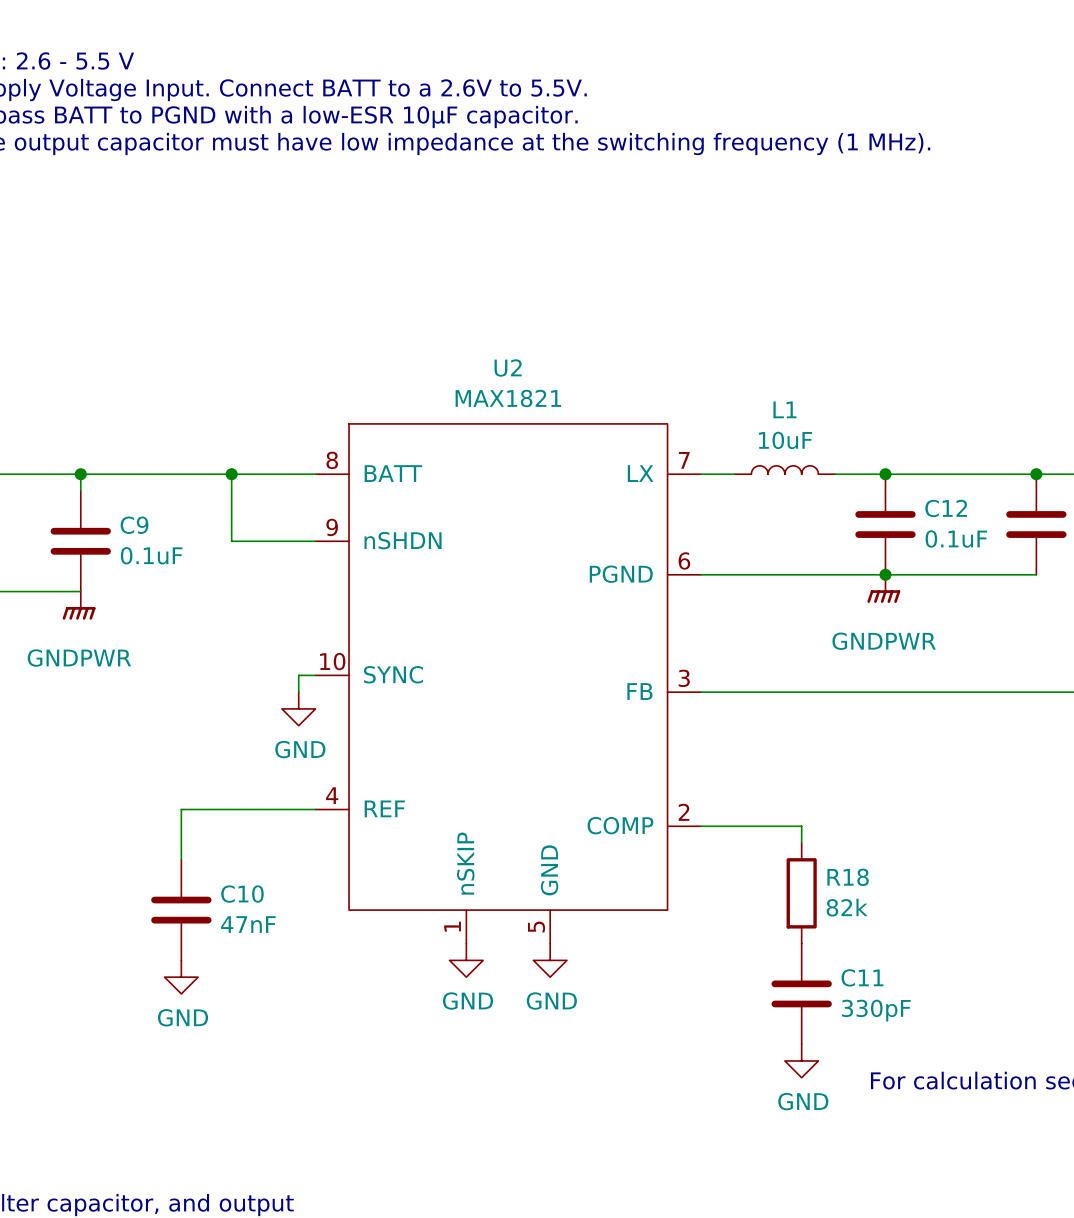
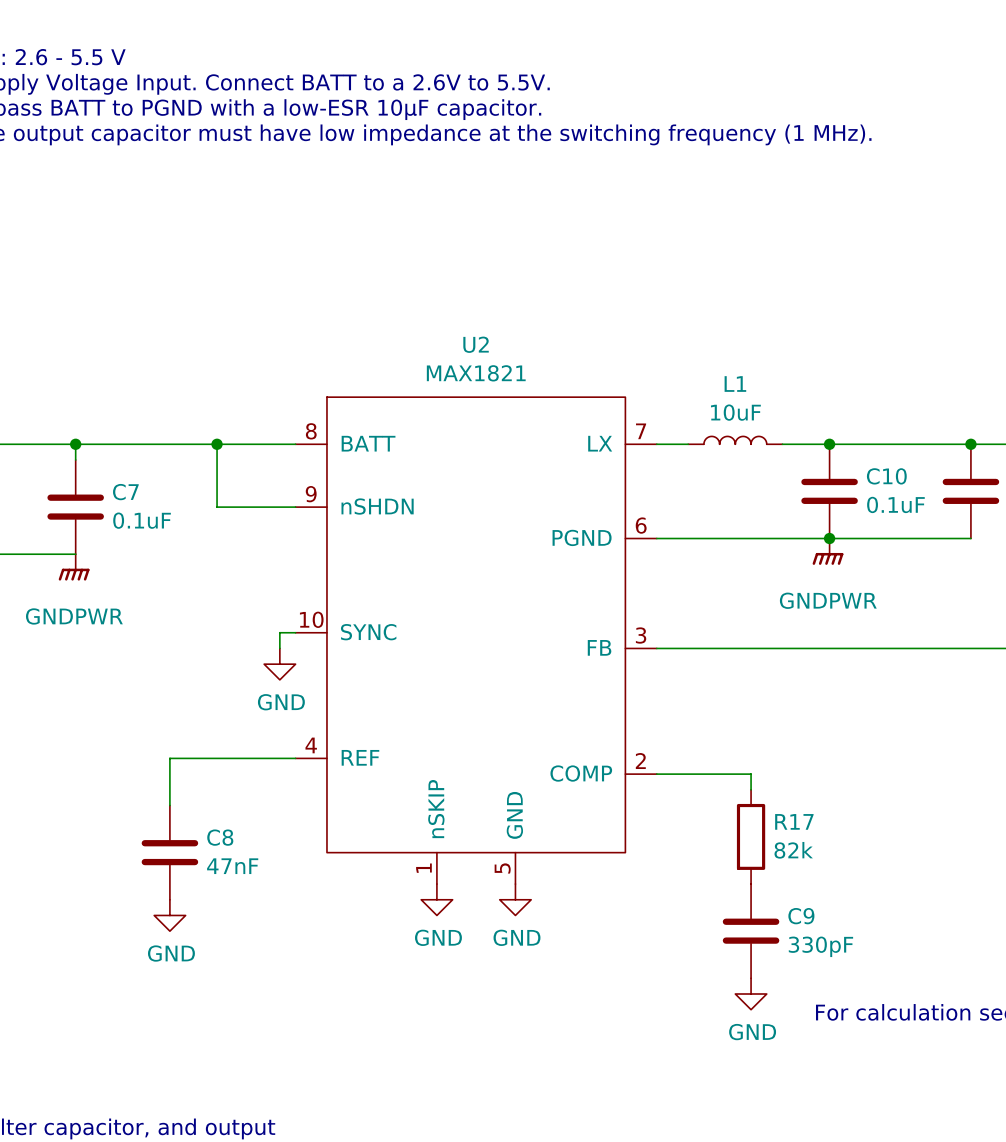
C12 name: C12 (946, 508) -> C10 (886, 476)
C9 name: C9 (134, 525) -> C7 (125, 492)
R18 name: R18 (848, 877) -> R17 (794, 821)
C10 name: C10 (242, 894) -> C8 (220, 837)
C11 name: C11 (862, 977) -> C9 (801, 916)

